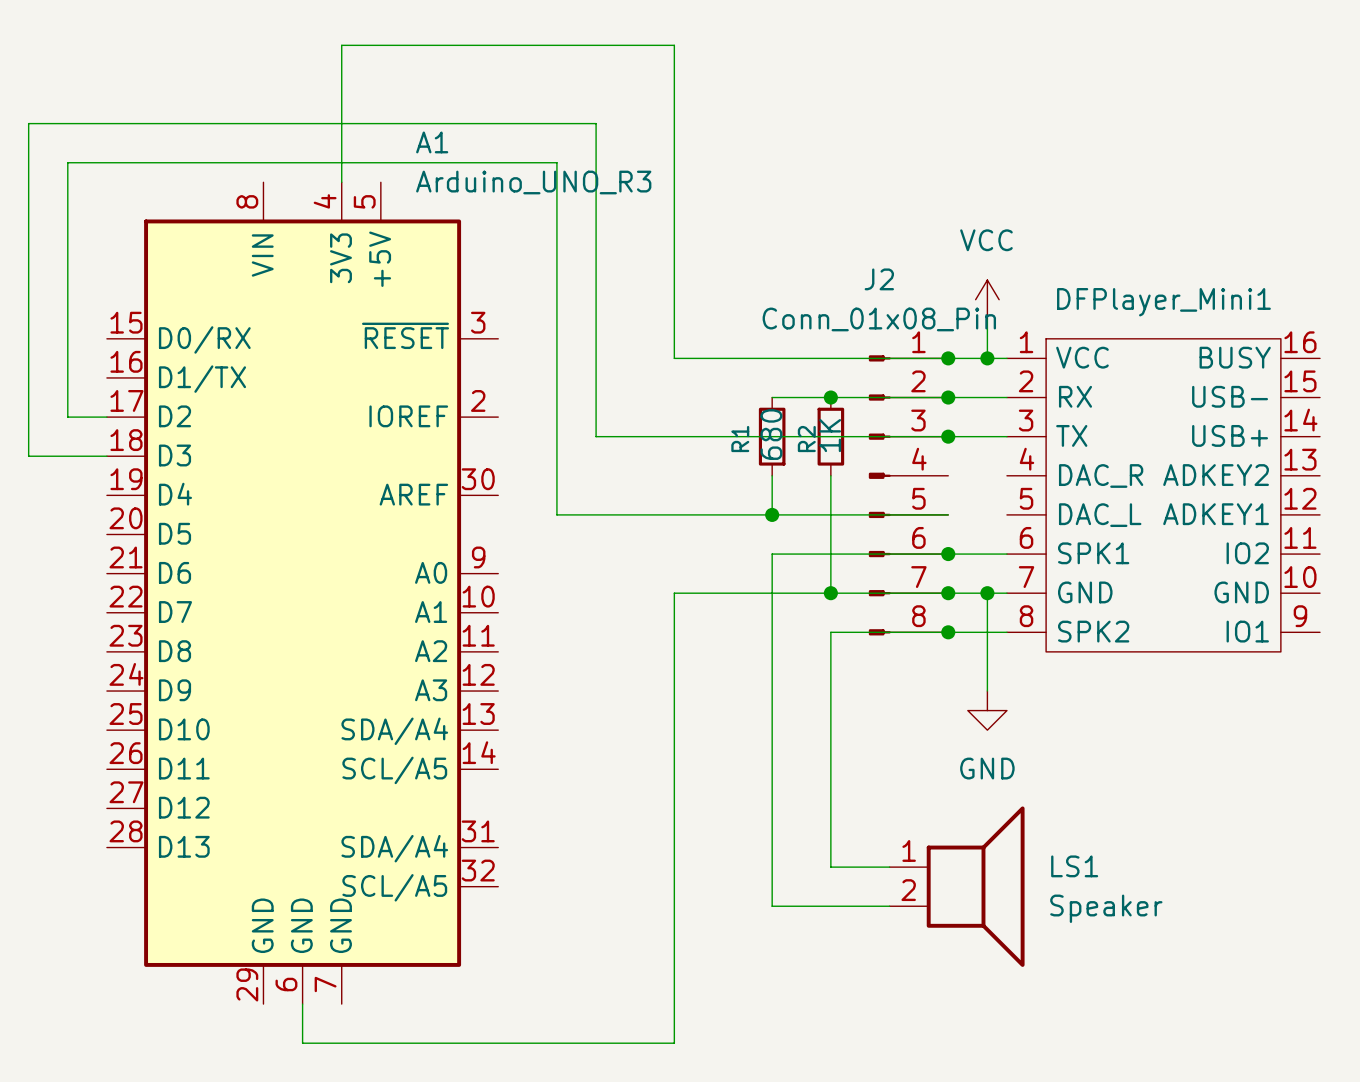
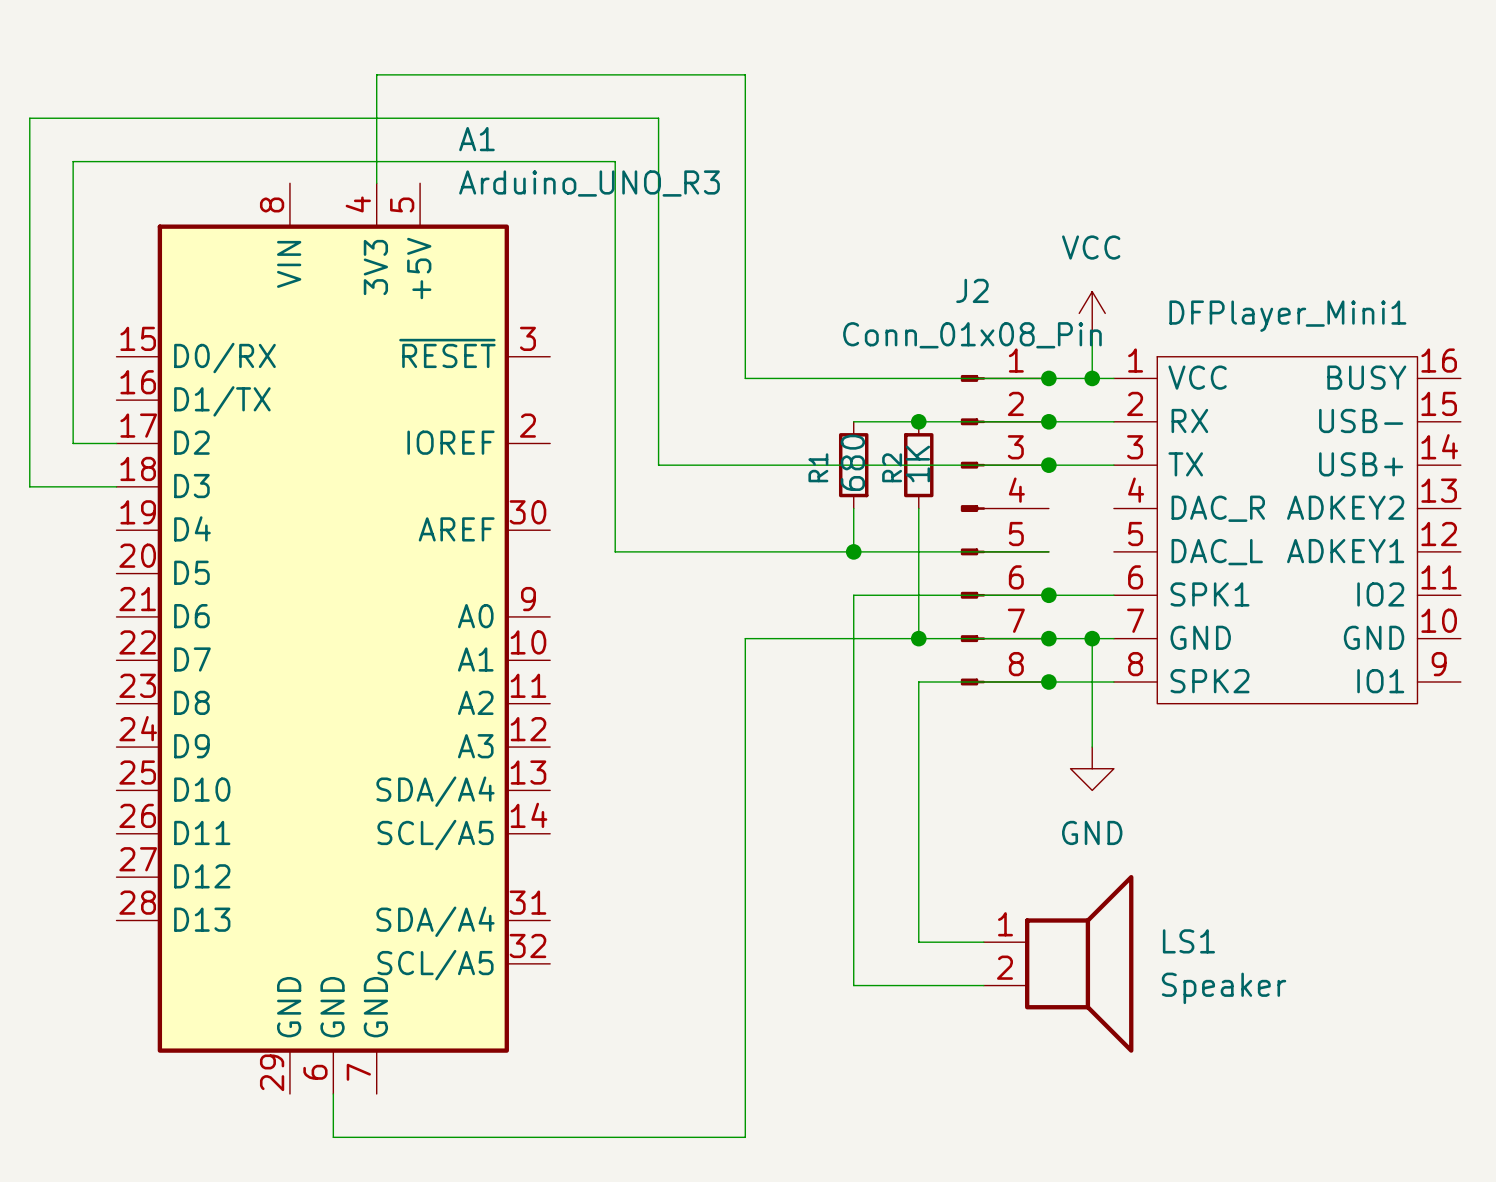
wire: (341, 84) (341, 45) (674, 45) (674, 84) -> (376, 74) (745, 74)

